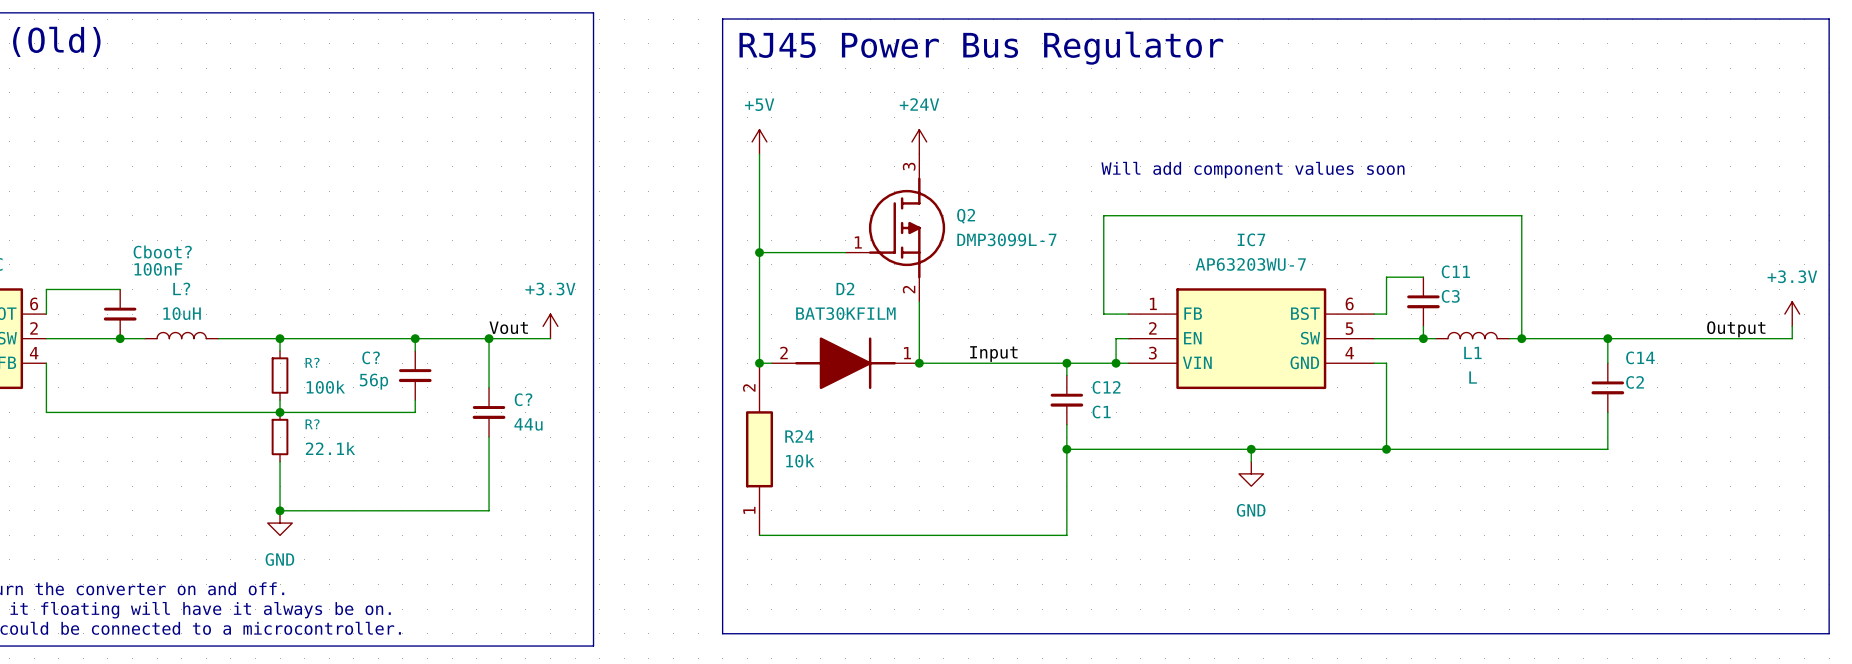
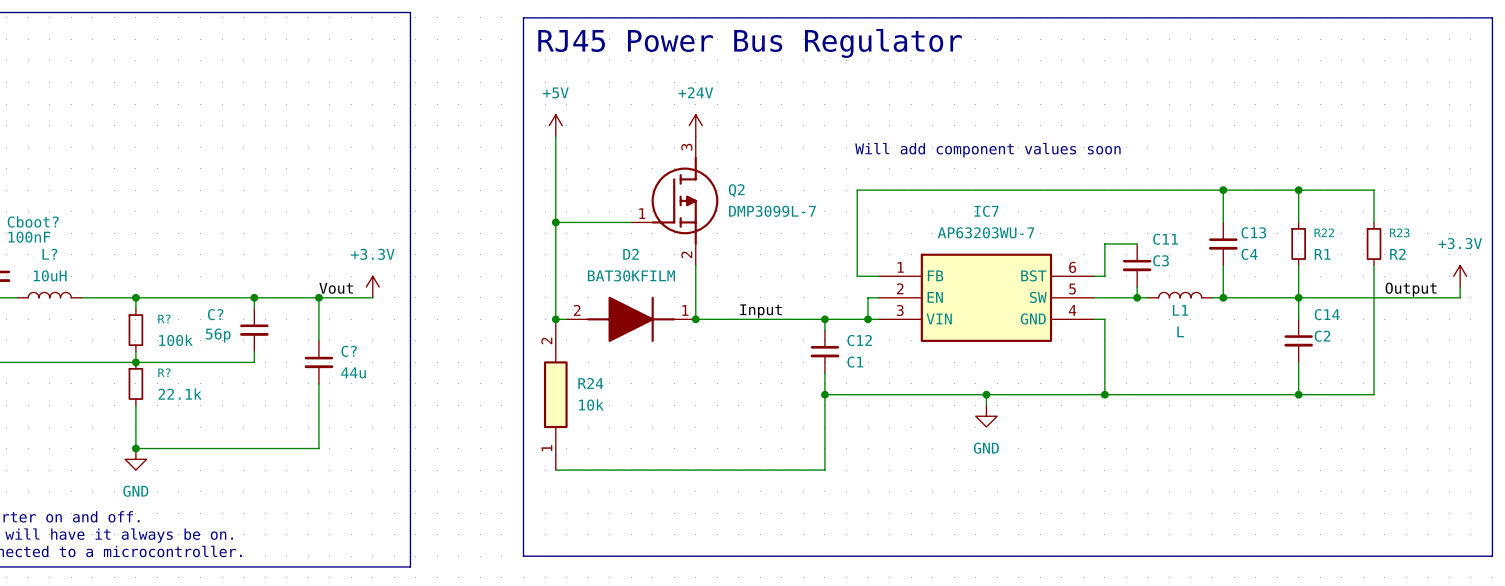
wire: none -> (1223, 190) (1374, 190) (1374, 222)
junction: none -> (1223, 190)
wire: none -> (1298, 190) (1298, 222)
junction: none -> (1298, 190)
C13: none -> C4 (1223, 243)
R22: none -> R1 (1298, 243)
R23: none -> R2 (1374, 243)
wire: none -> (1298, 265) (1298, 297)
wire: none -> (1374, 265) (1374, 394) (1298, 394)
junction: none -> (1298, 394)

